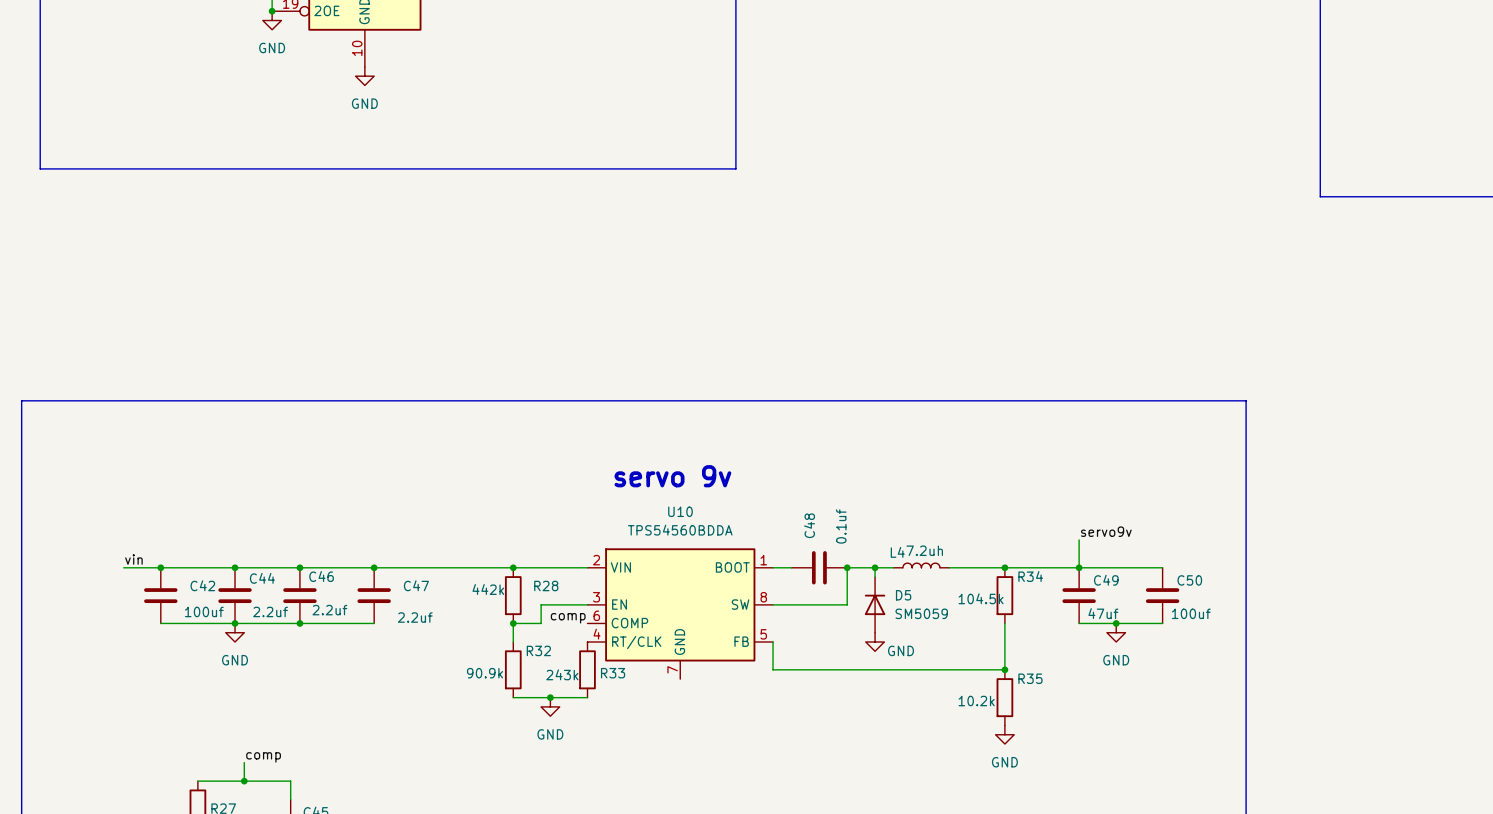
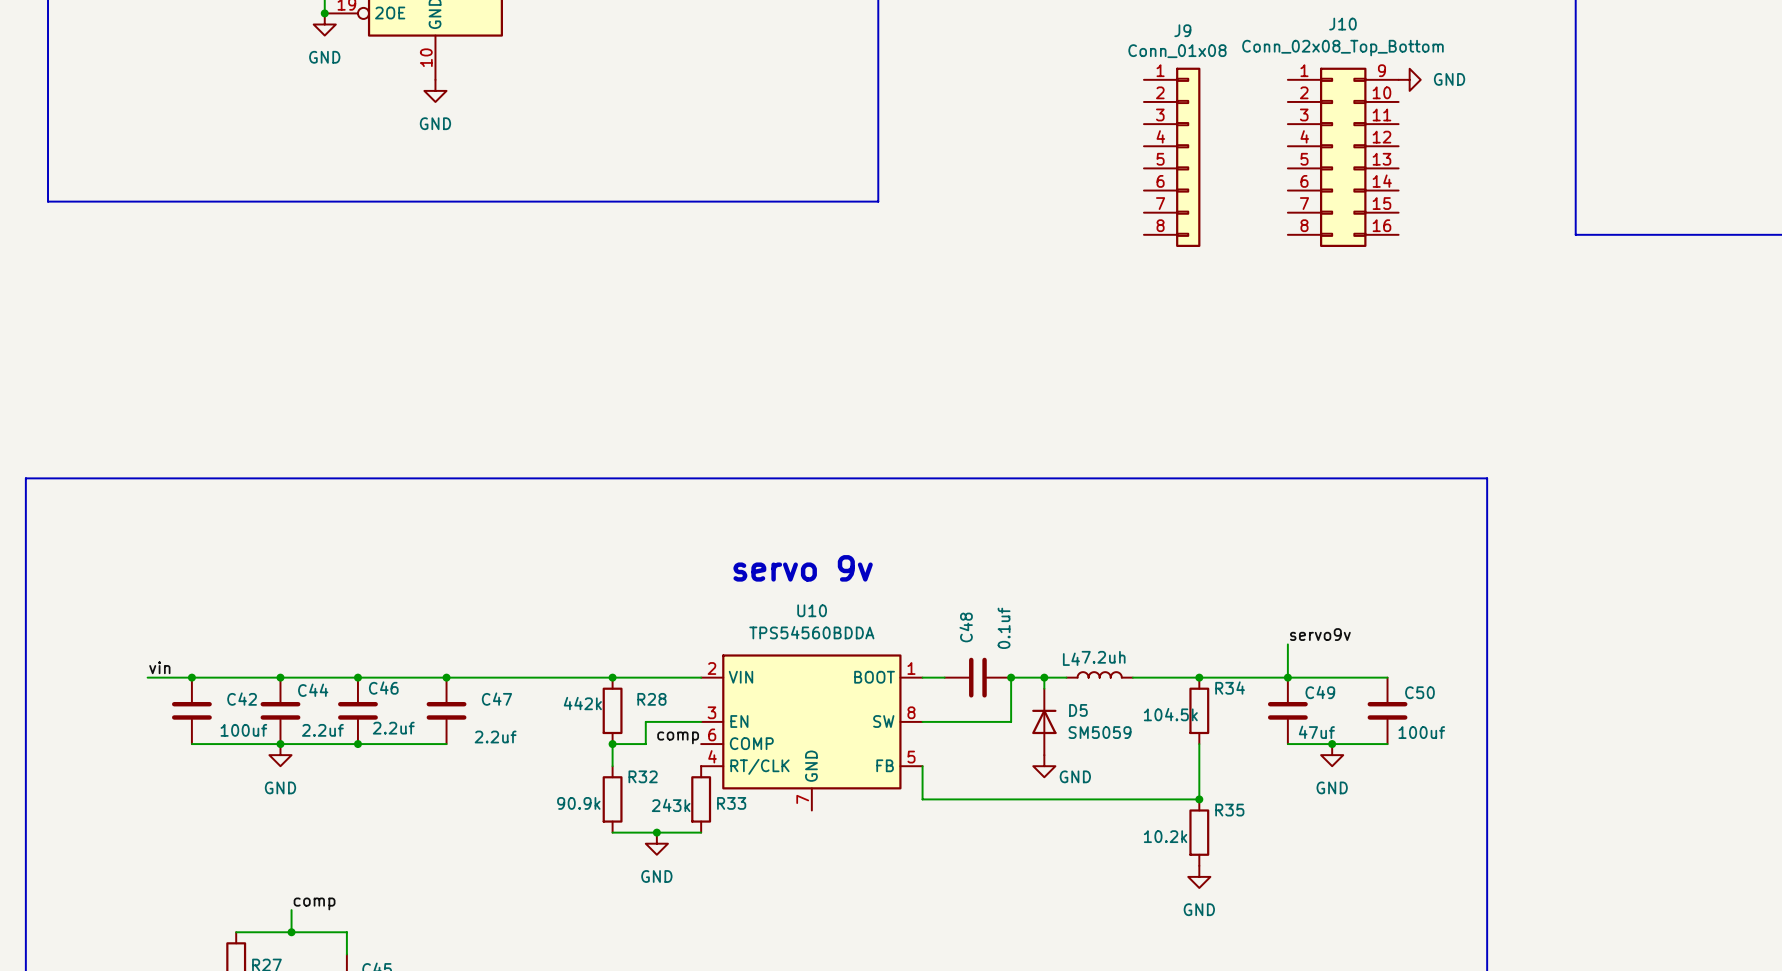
power symbol: none -> GND (1409, 79)
J9: none -> Conn_01x08 (1172, 157)
J10: none -> Conn_02x08_Top_Bottom (1343, 157)

